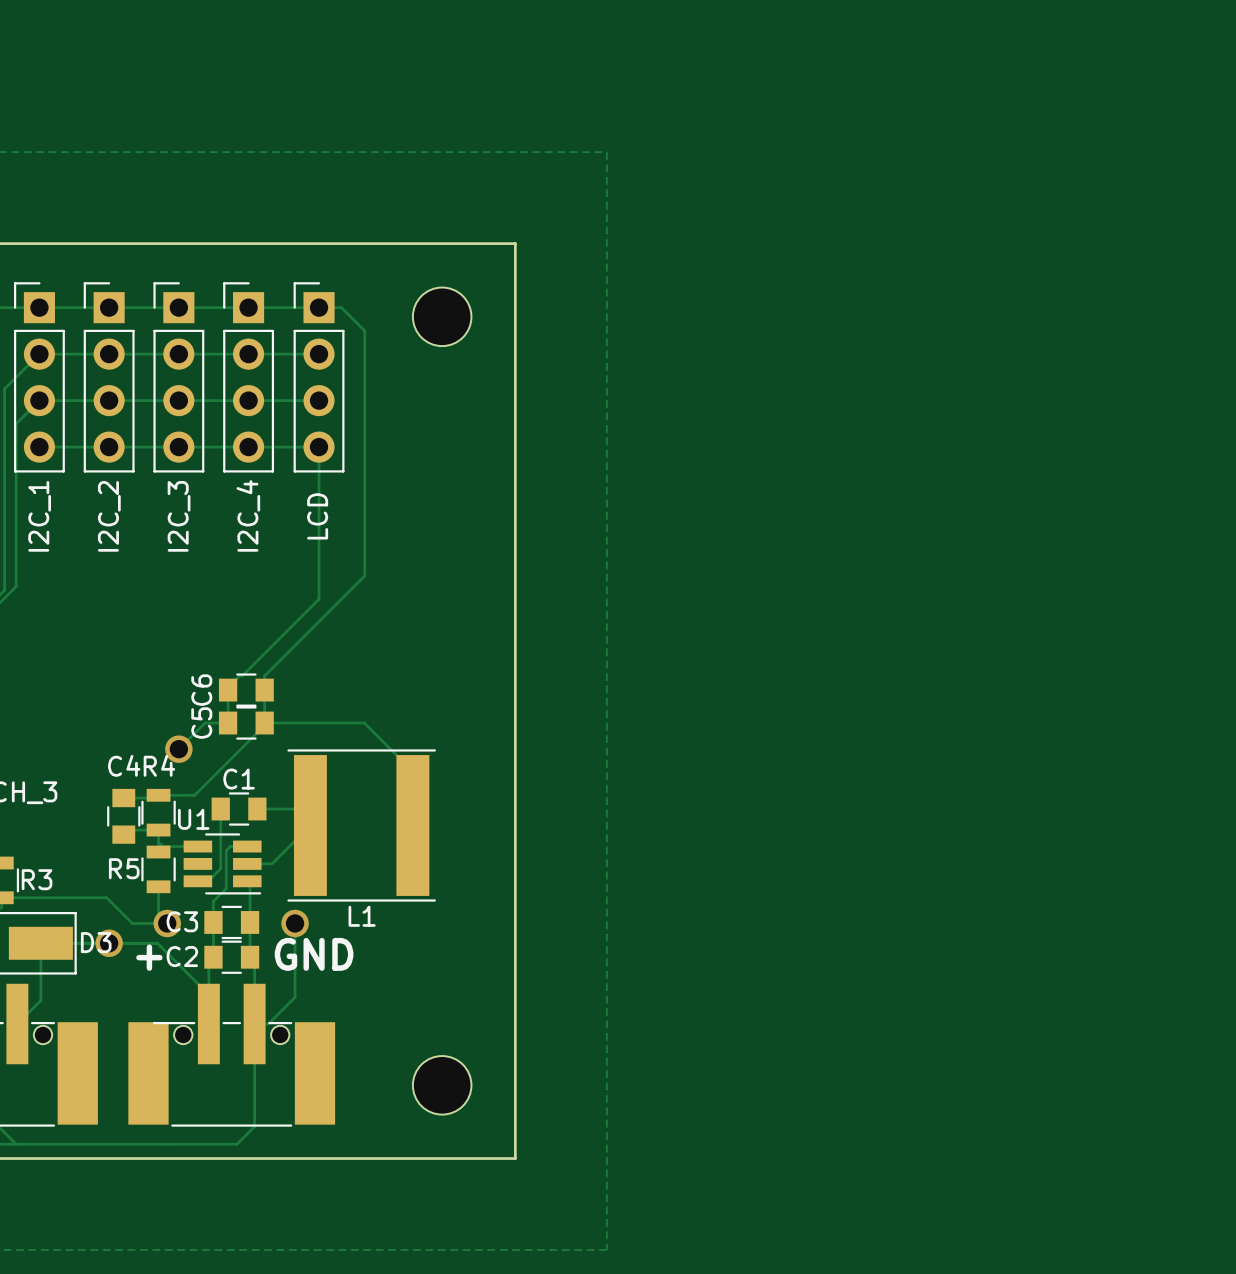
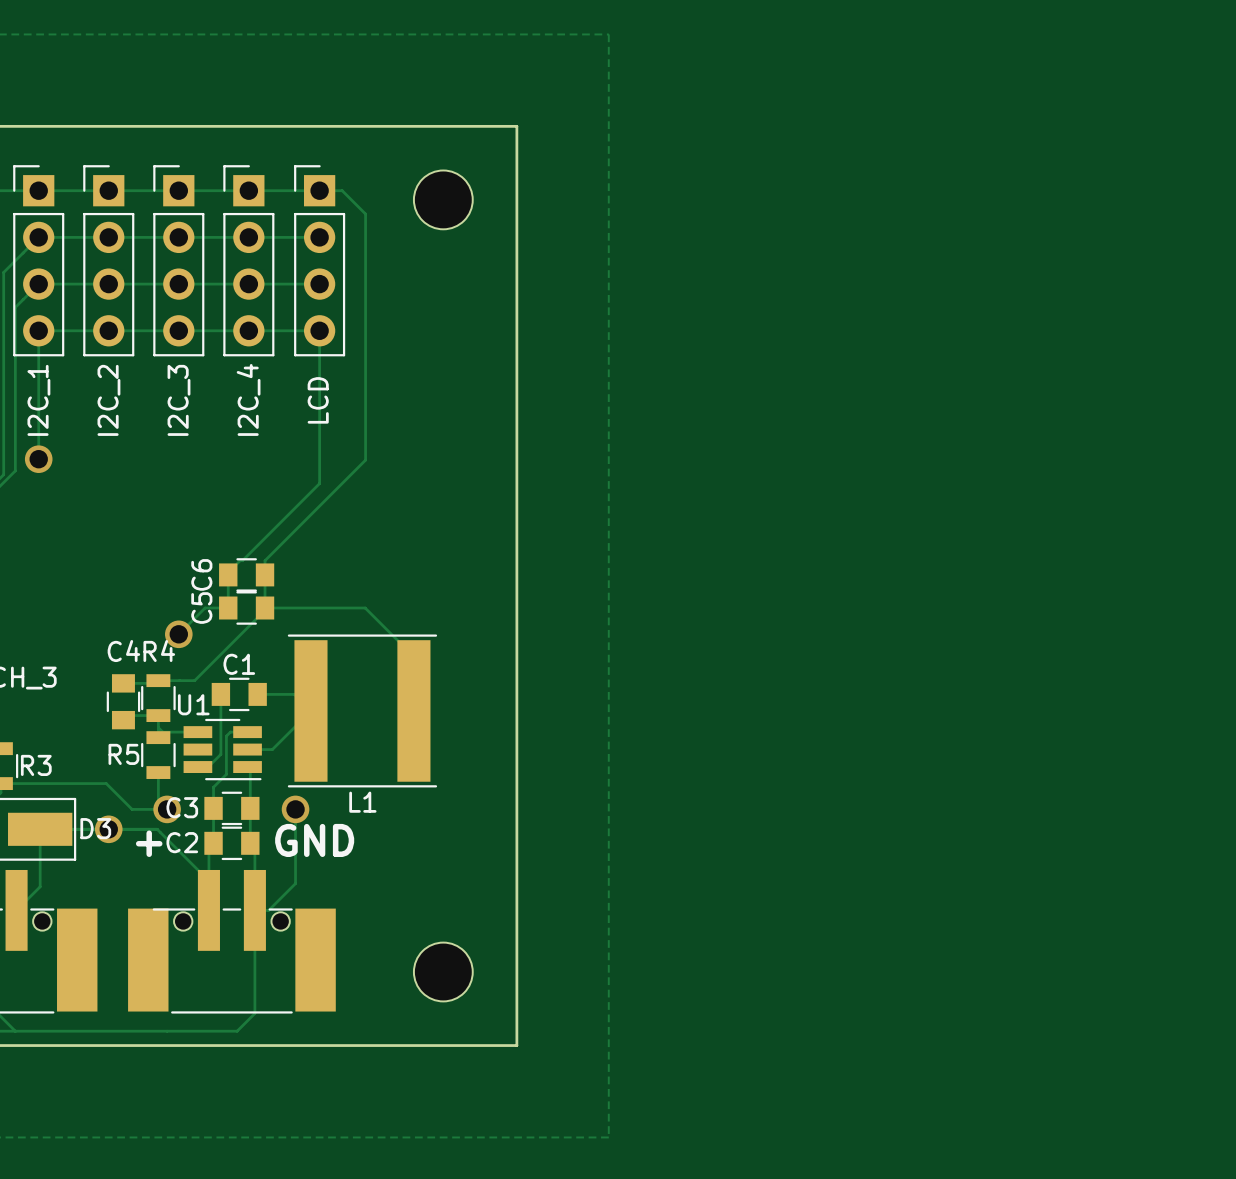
track: none -> (38, 330) (38, 459)
via: none -> (38, 459)

